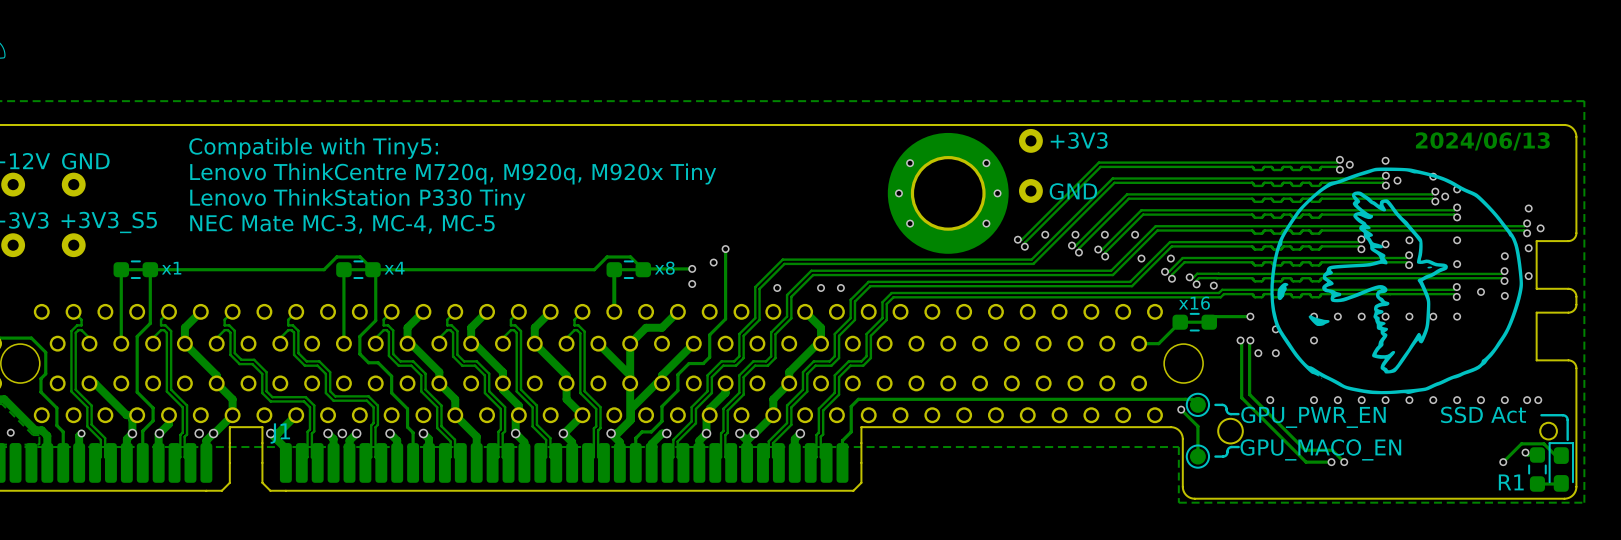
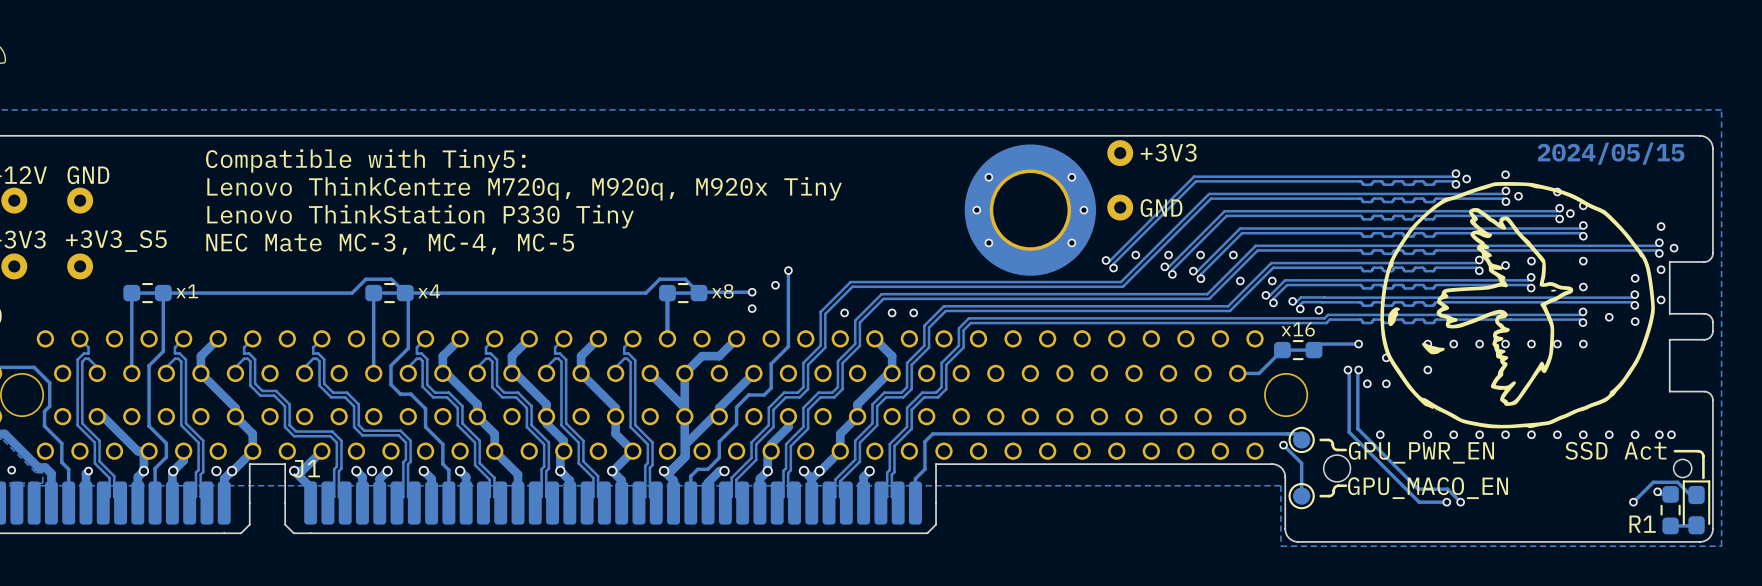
text: 2024/06/13 (1482, 141) -> 2024/05/15 (1611, 153)

